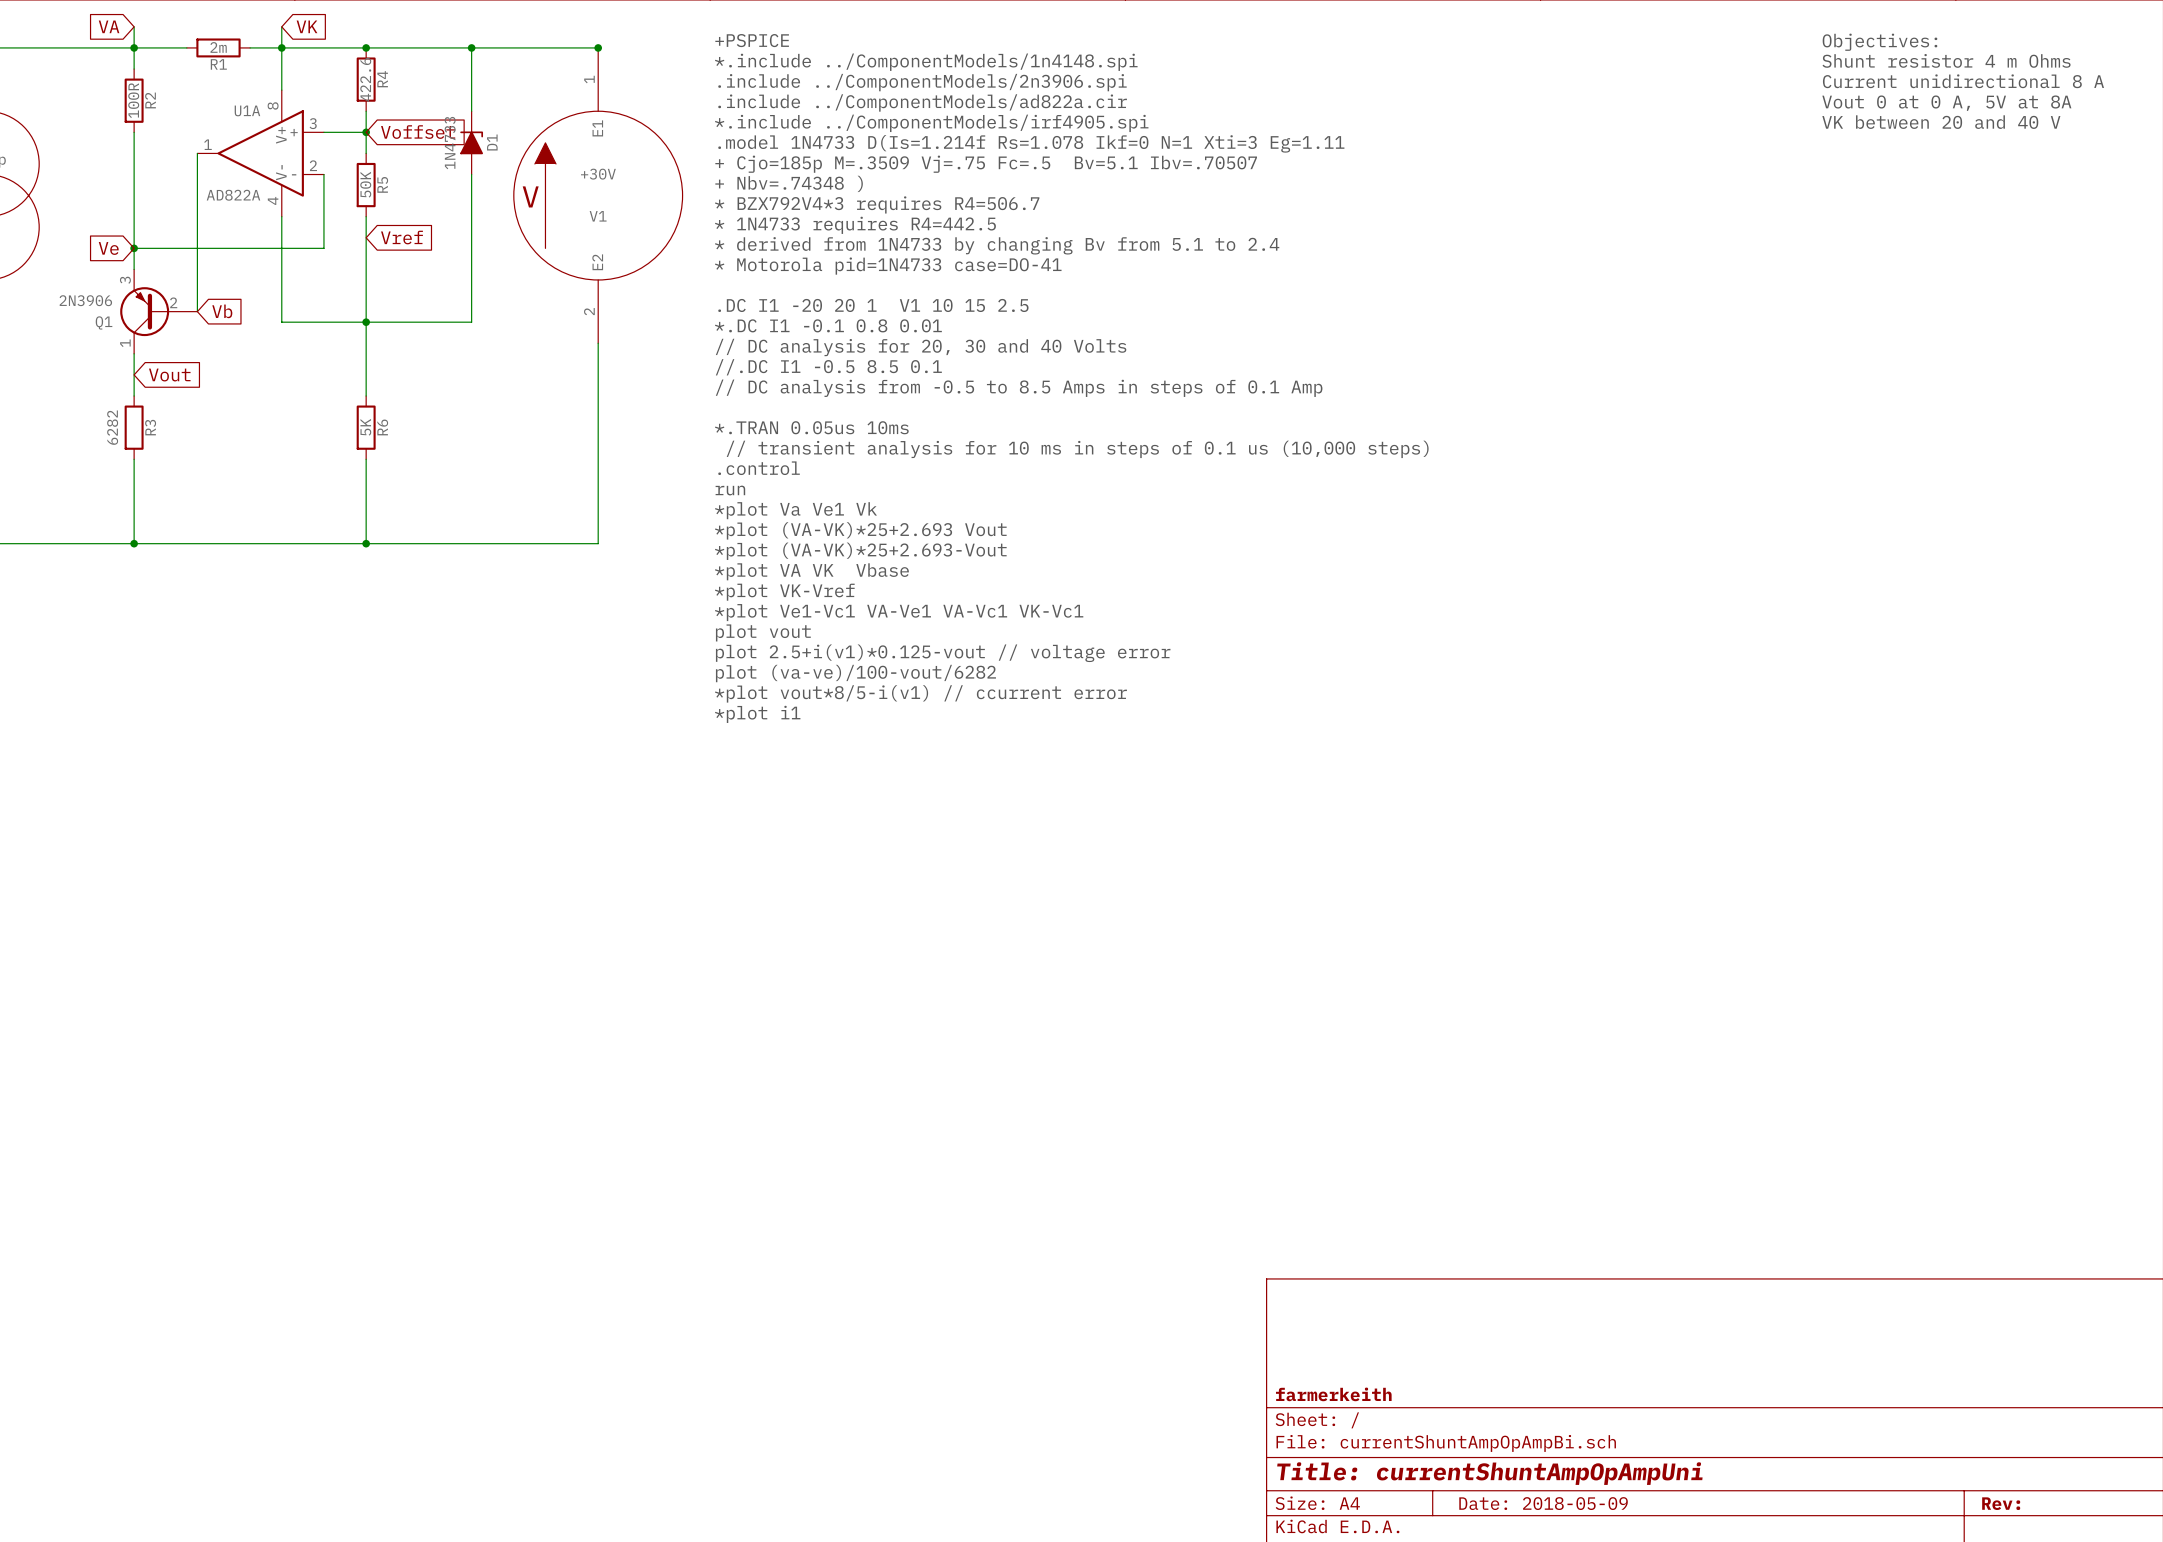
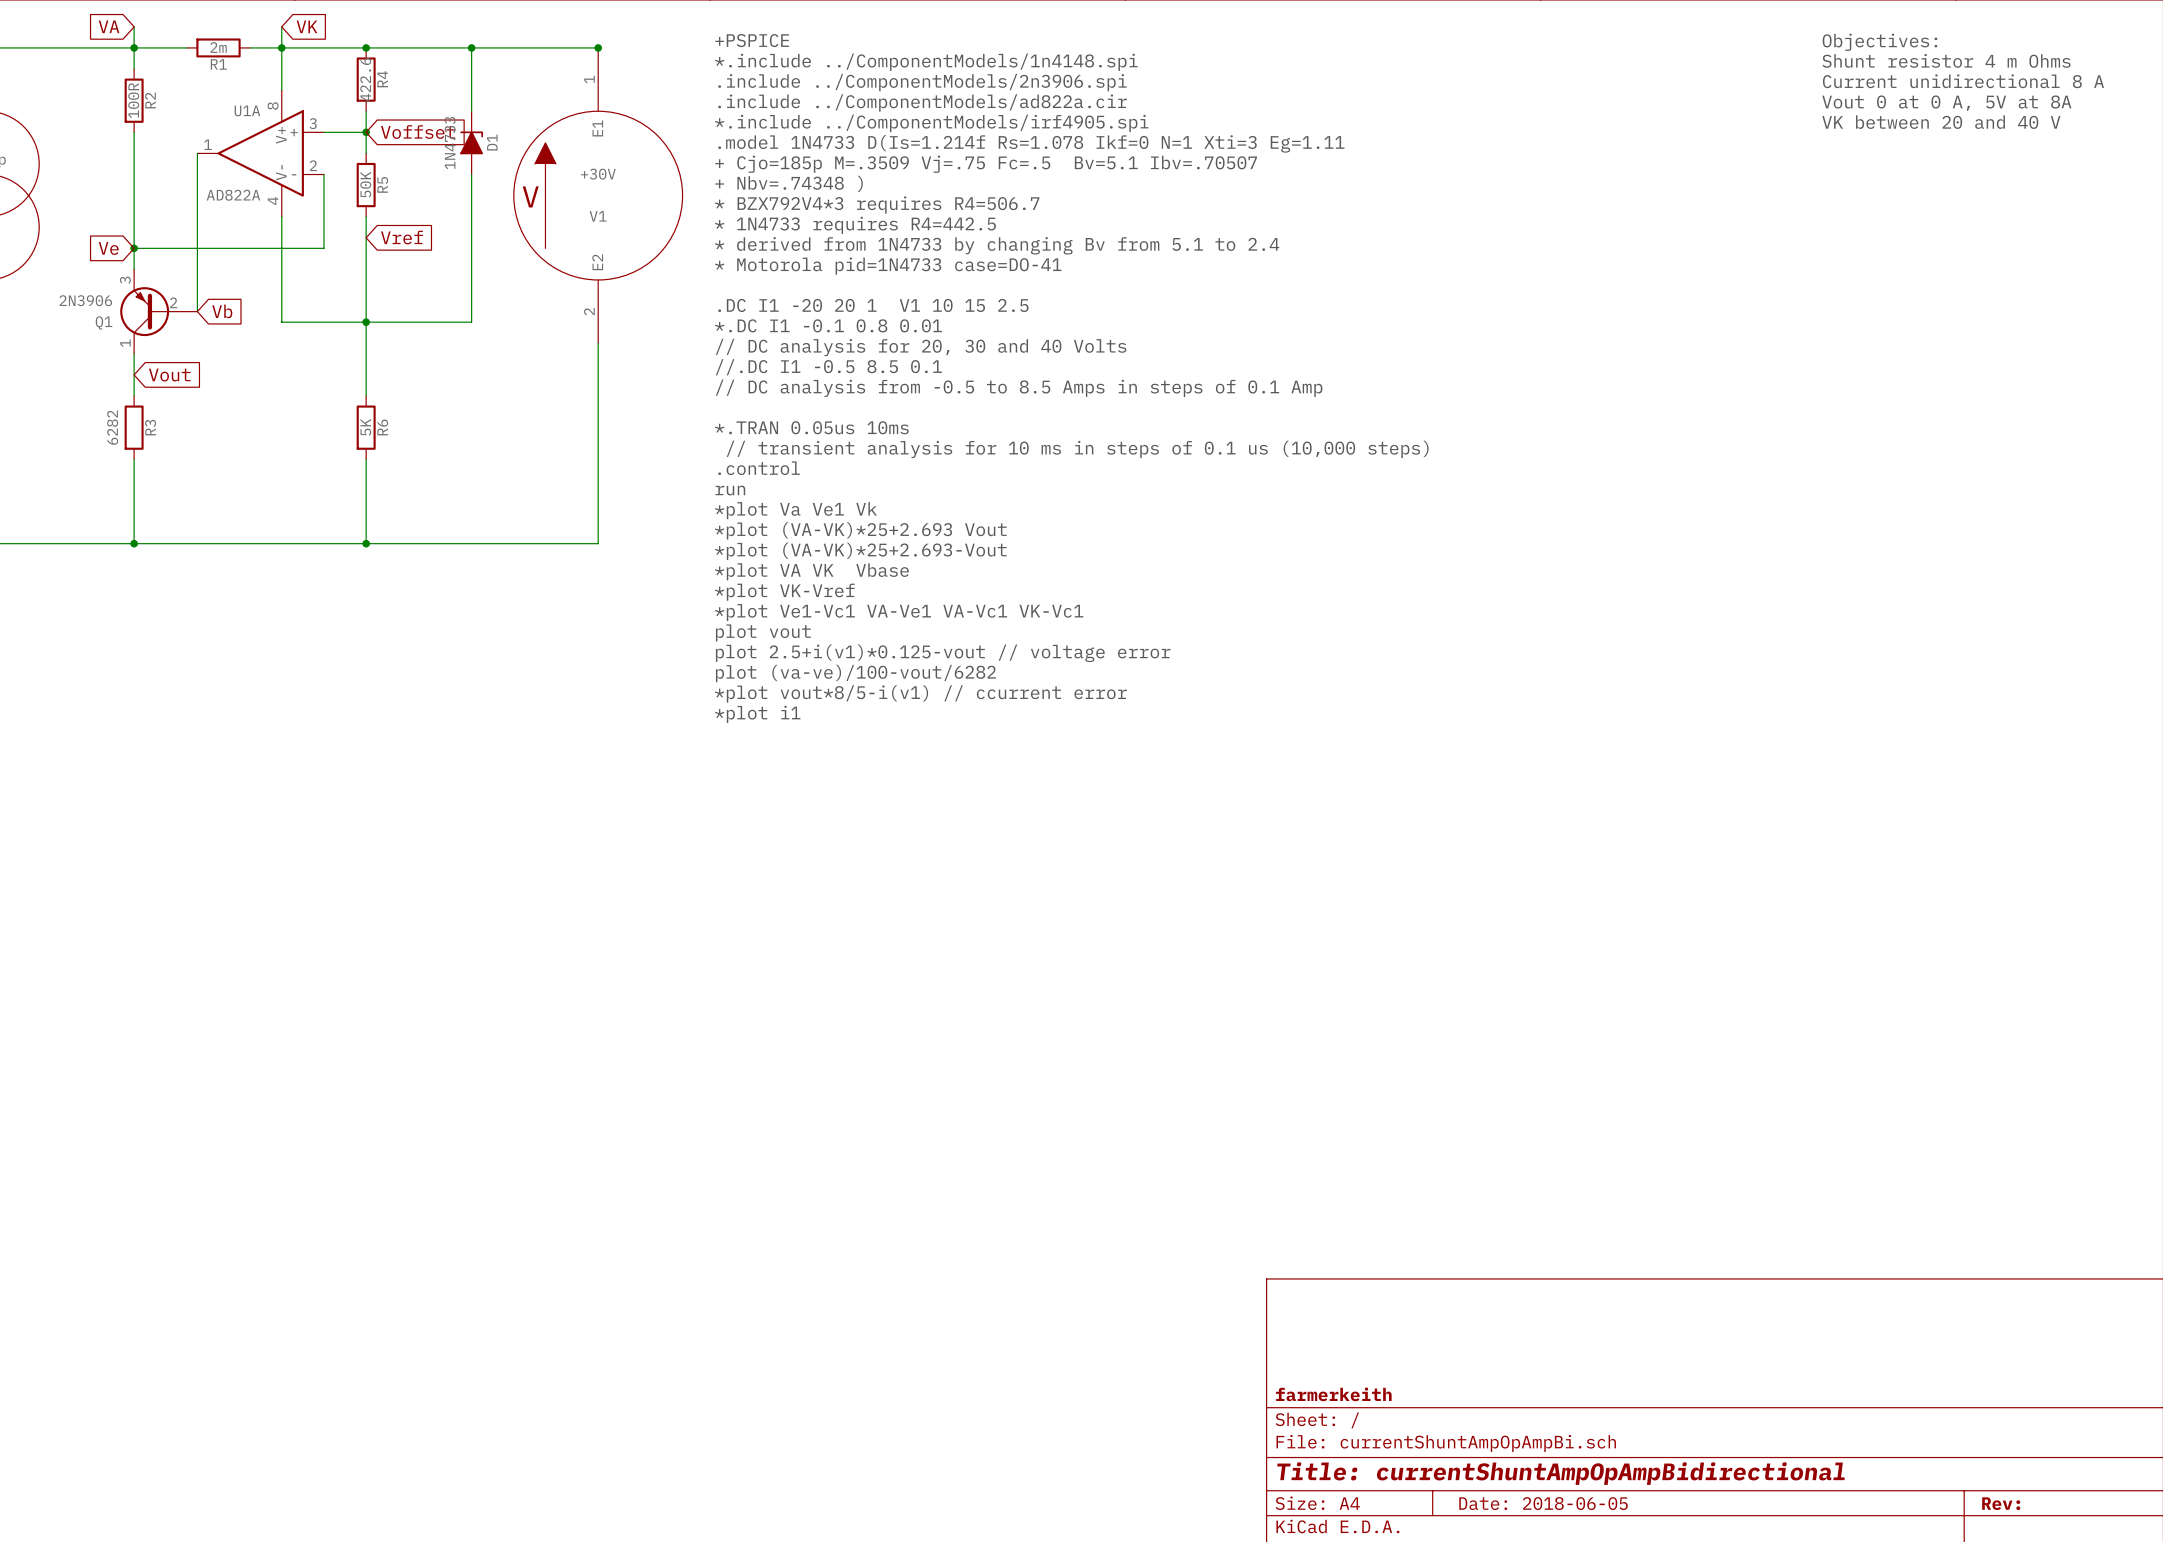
title block: Title: currentShuntAmpOpAmpUni (1489, 1473) -> Title: currentShuntAmpOpAmpBidirectional (1560, 1473)
title block: Date: 2018-05-09 (1543, 1503) -> Date: 2018-06-05 (1543, 1503)

